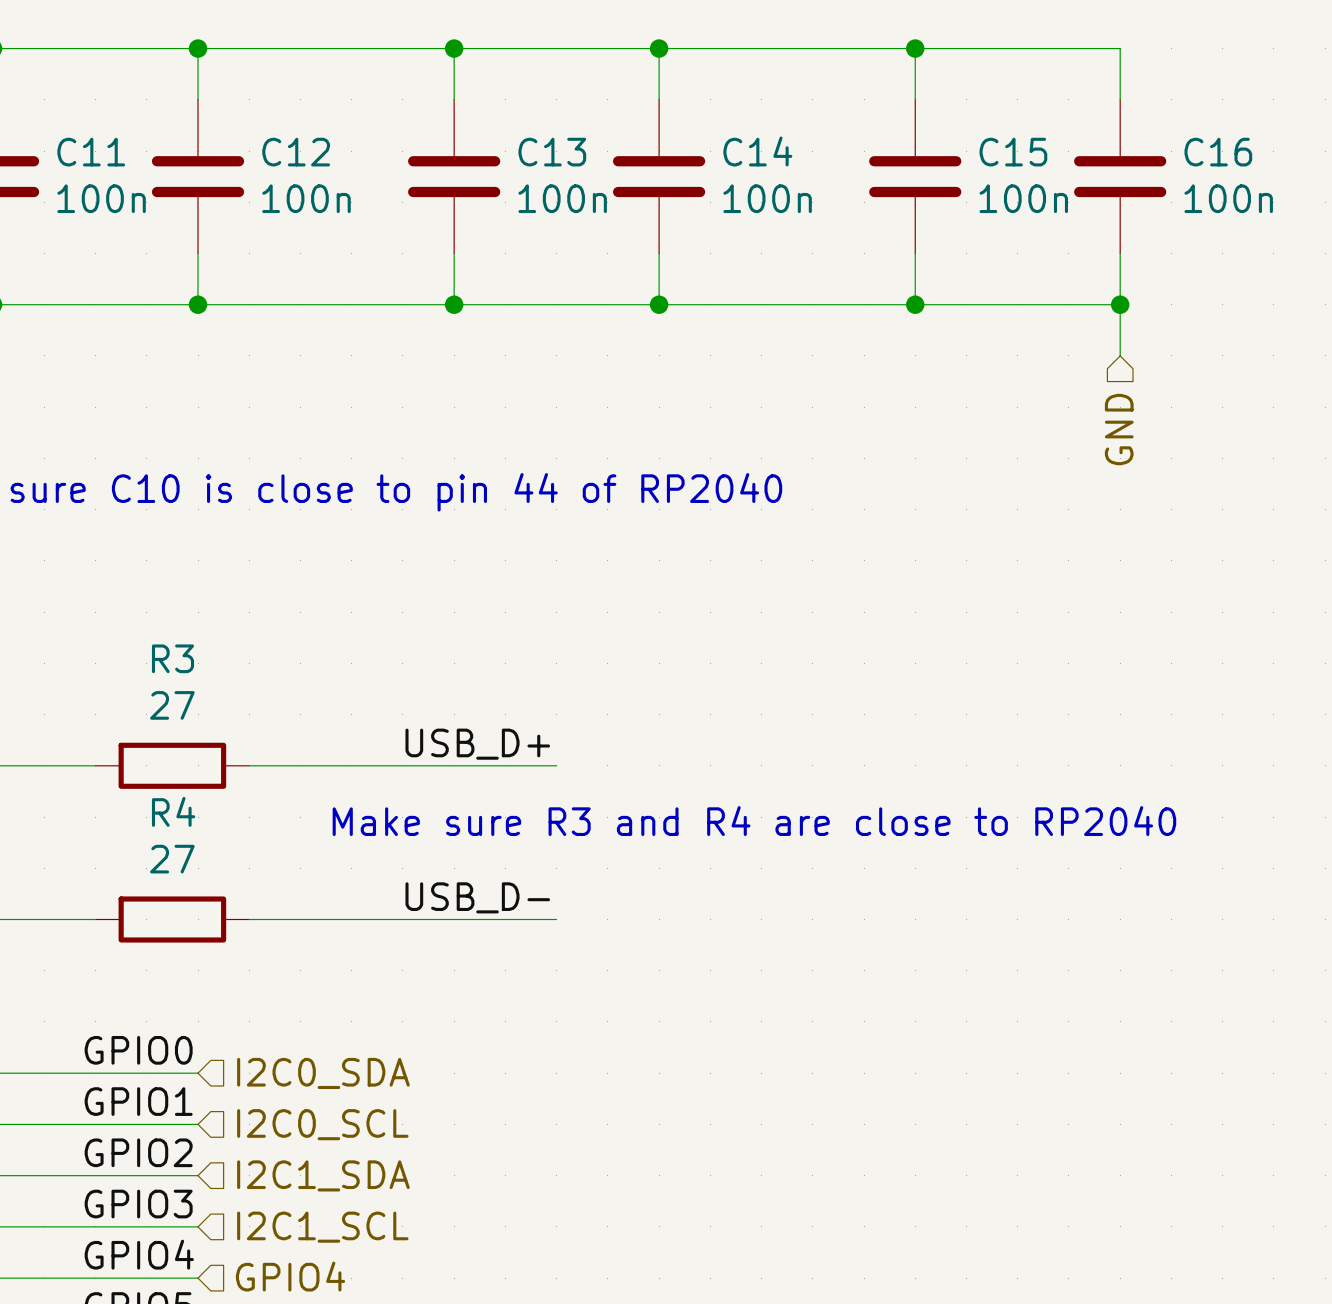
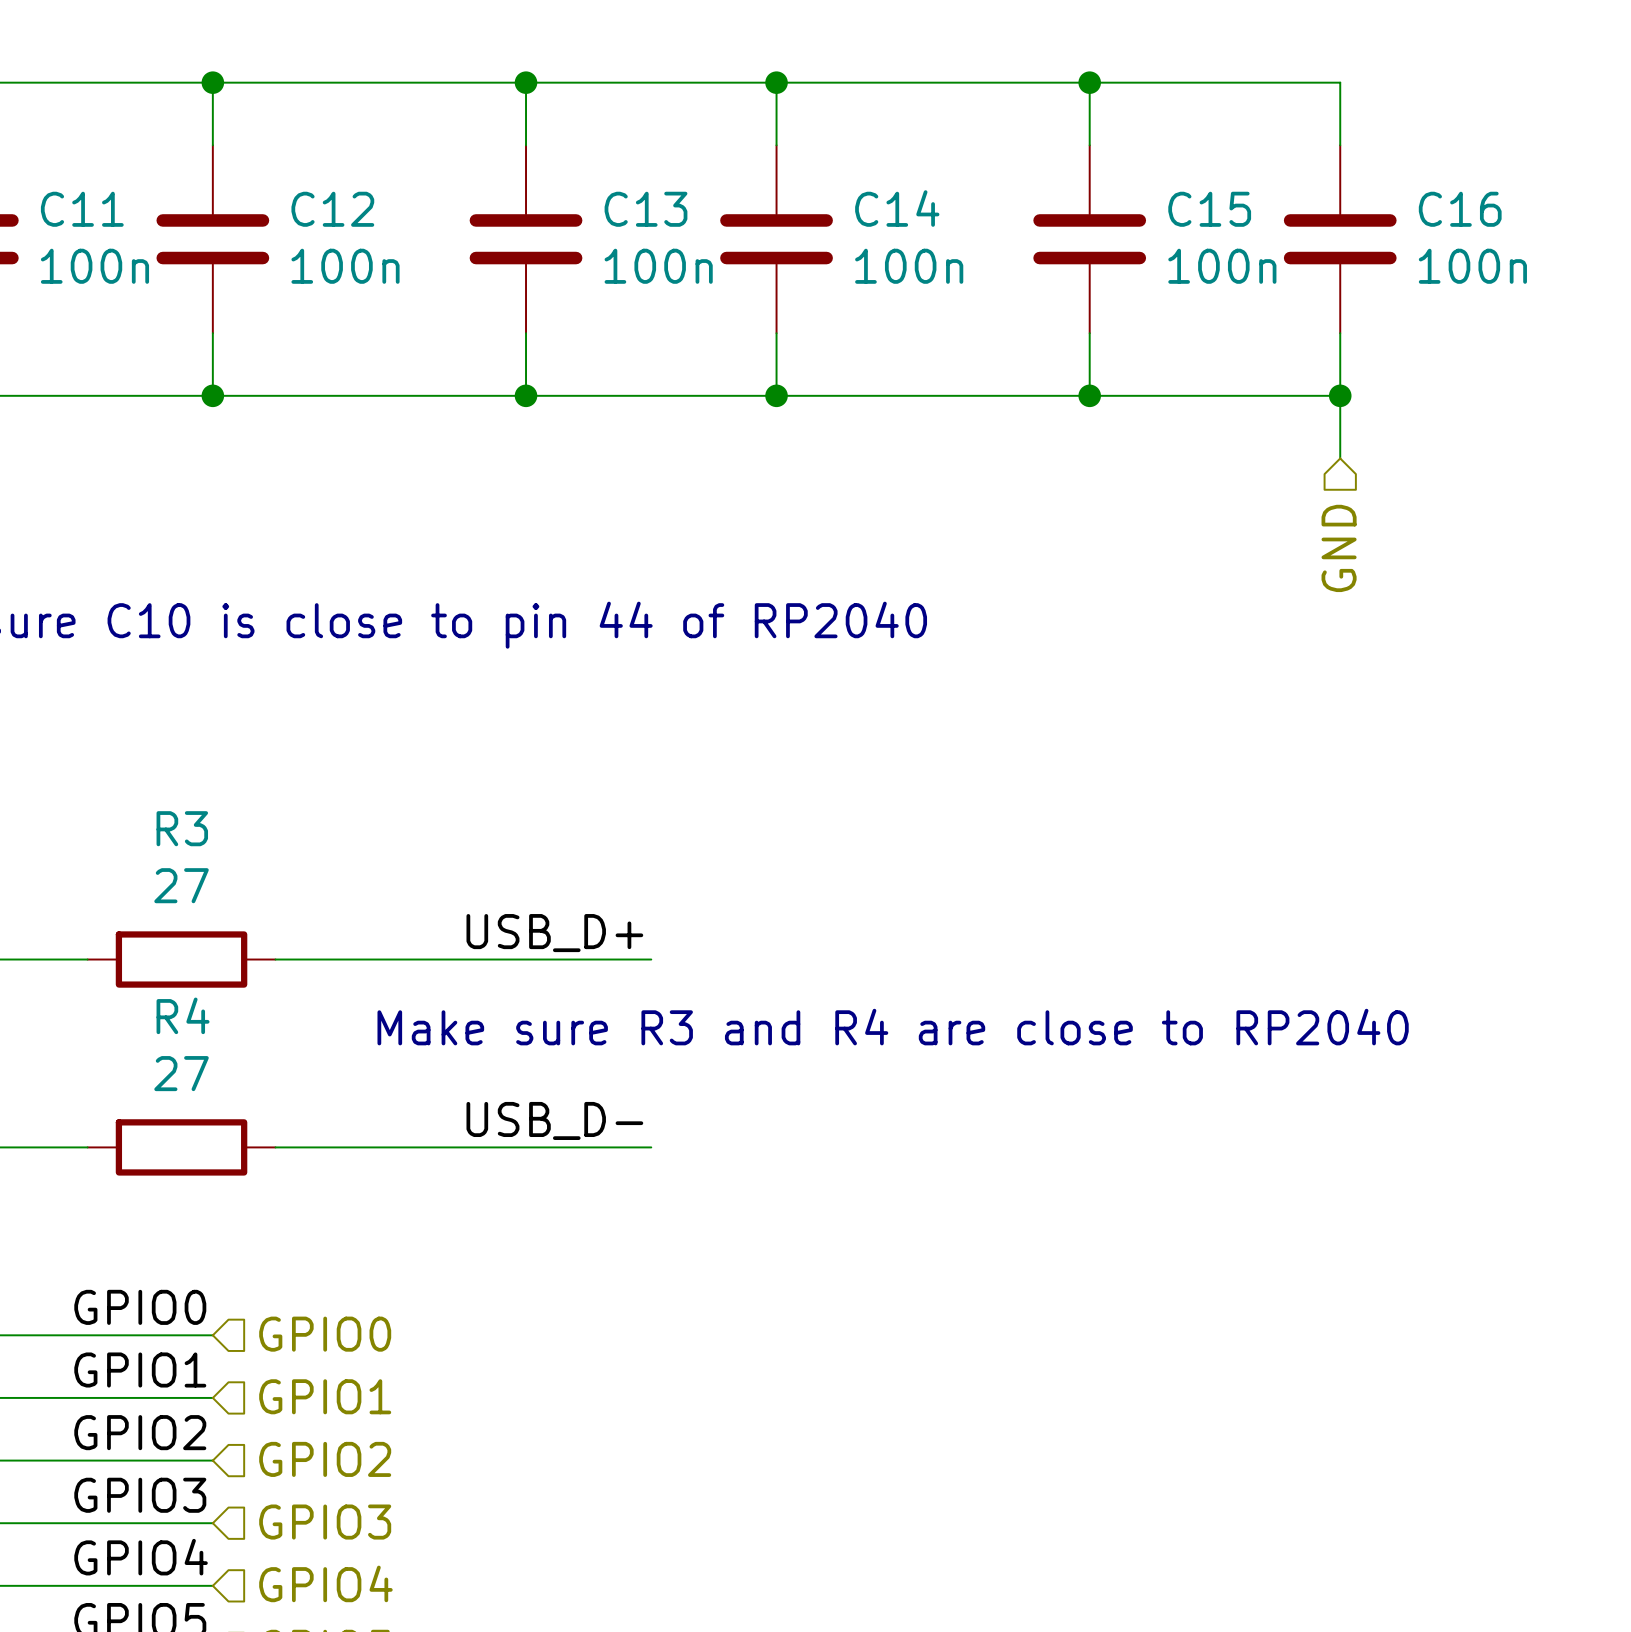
hierarchical label: I2C0_SDA (323, 1073) -> GPIO0 (325, 1334)
hierarchical label: I2C0_SCL (322, 1124) -> GPIO1 (325, 1396)
hierarchical label: I2C1_SDA (323, 1175) -> GPIO2 (325, 1459)
hierarchical label: I2C1_SCL (322, 1227) -> GPIO3 (325, 1522)

